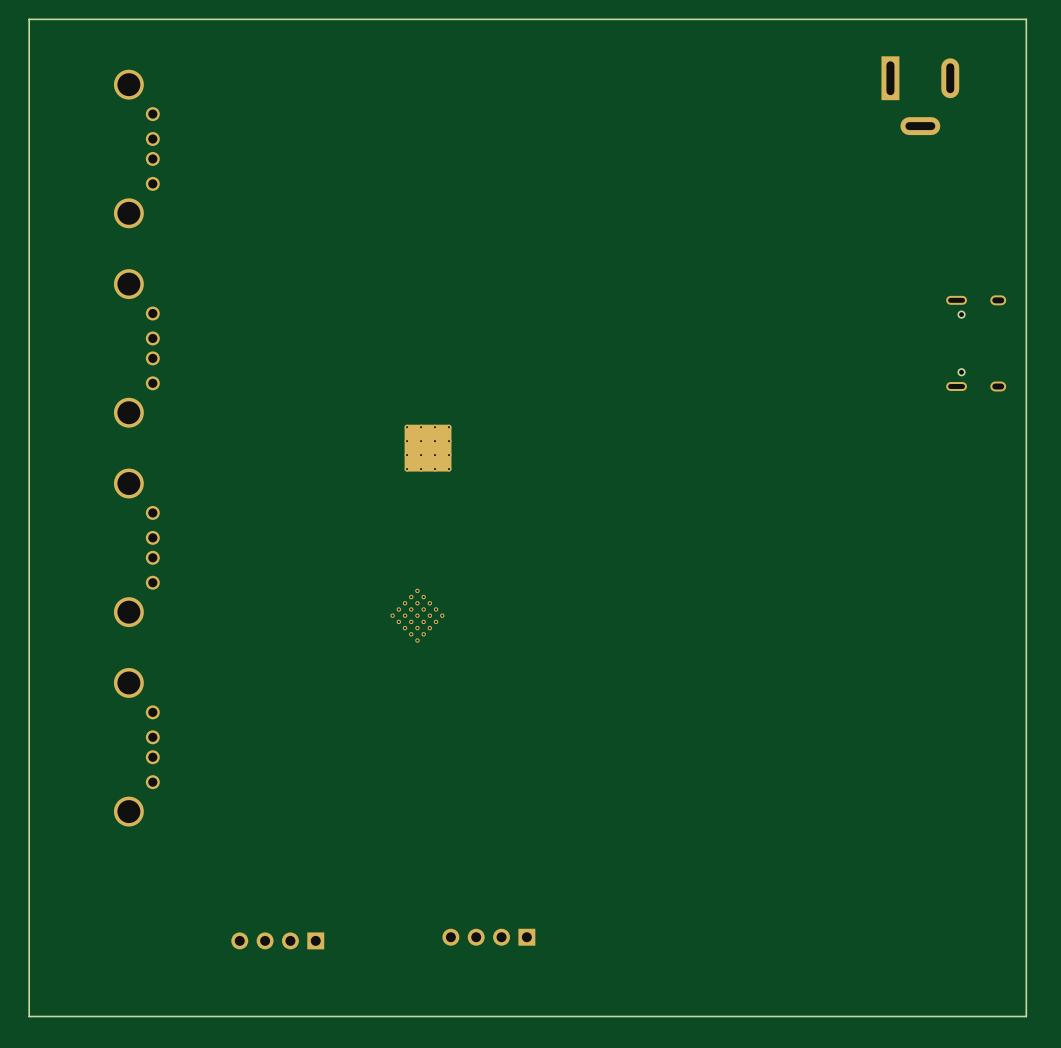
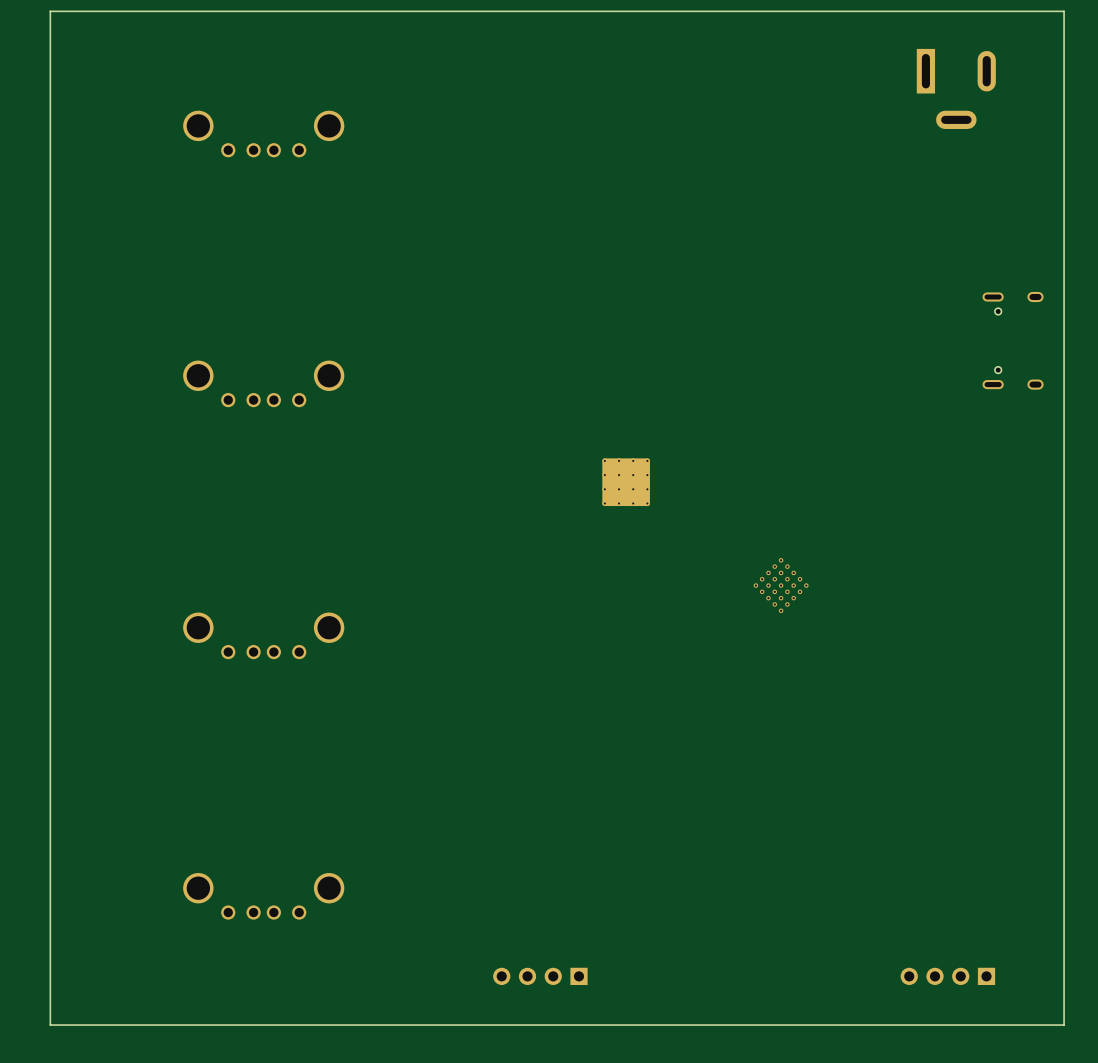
part rotation: 0° (136, 148) -> 90° clockwise (263, 134)
part position: (136, 148) -> (263, 134)
part: (136, 348) -> none
part: none -> (263, 383)
part position: (428, 448) -> (626, 482)
part: (136, 547) -> none
part: none -> (781, 585)
part: (417, 615) -> none
part: none -> (263, 635)
part: (136, 747) -> none
part: none -> (263, 896)
part position: (488, 937) -> (540, 976)
part: (277, 940) -> none
part: none -> (947, 976)

